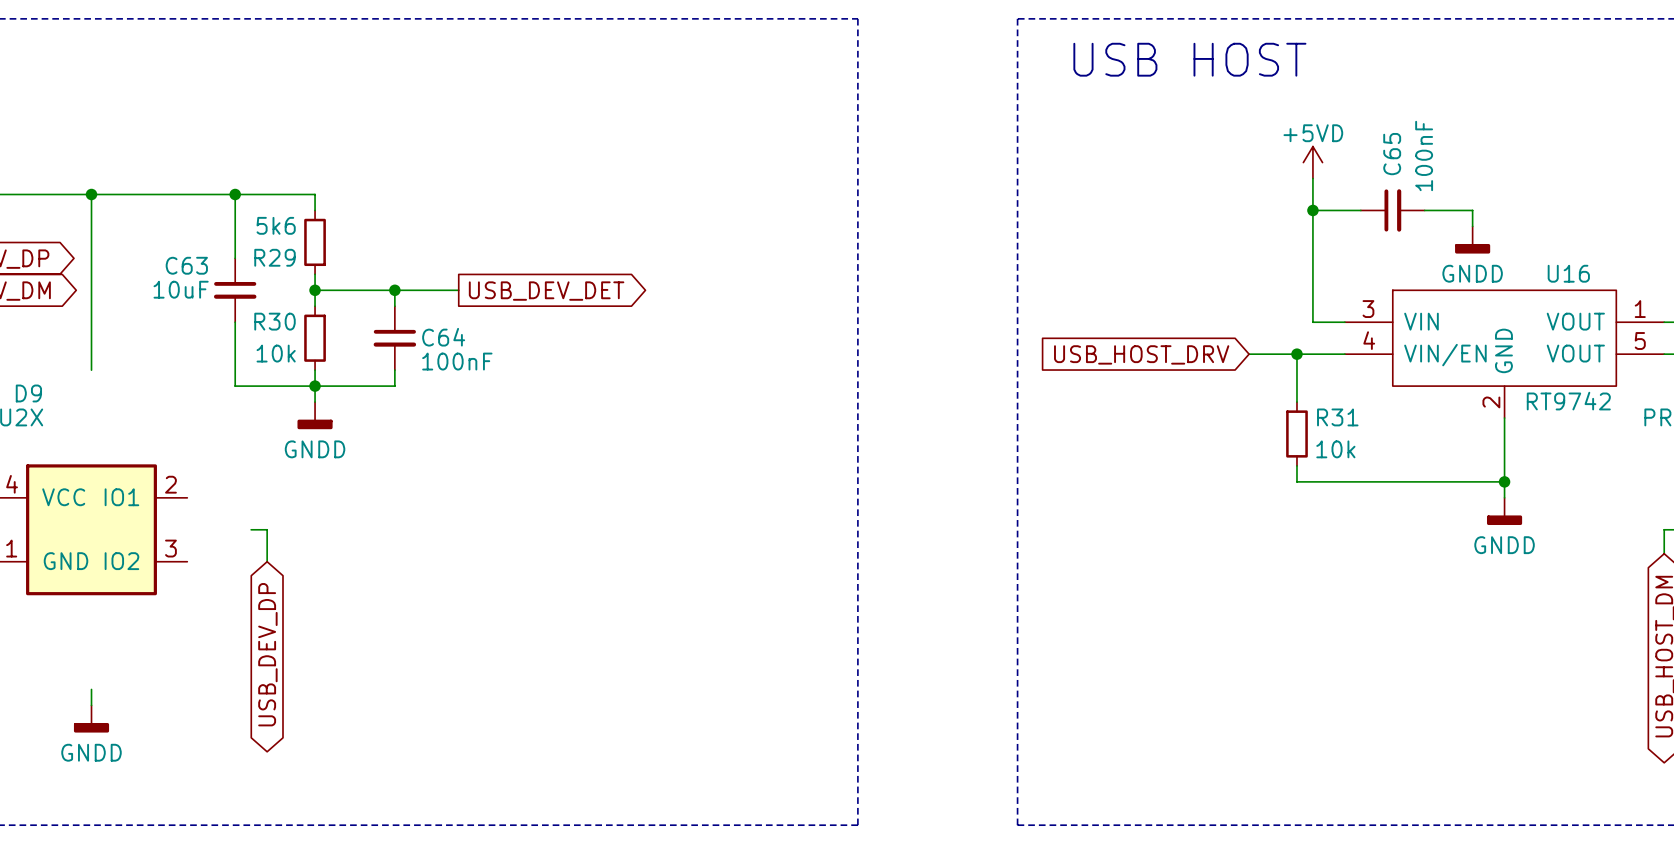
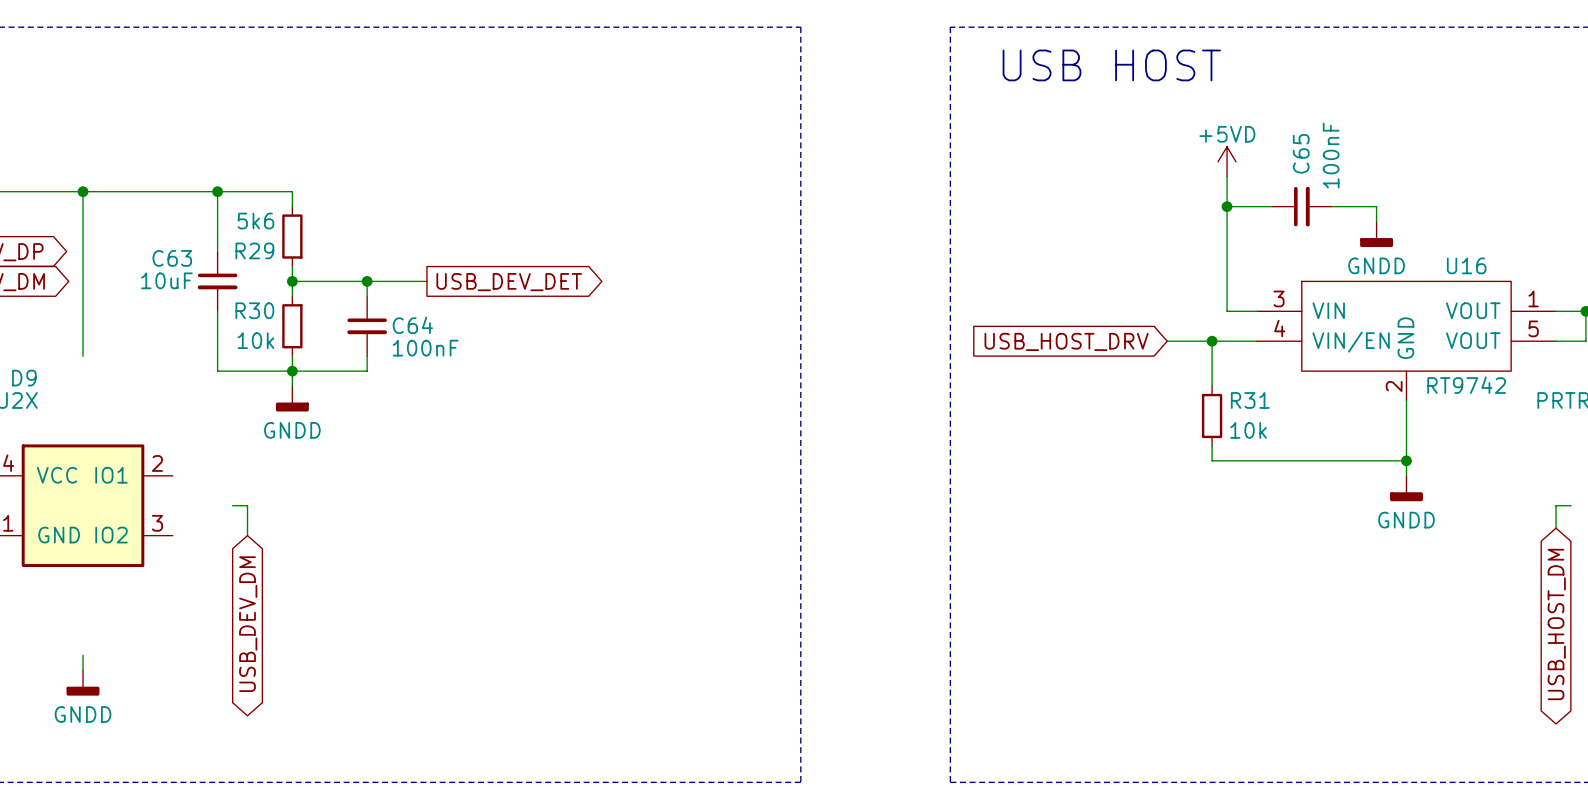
global label: USB_DEV_DP (267, 654) -> USB_DEV_DM (248, 624)

